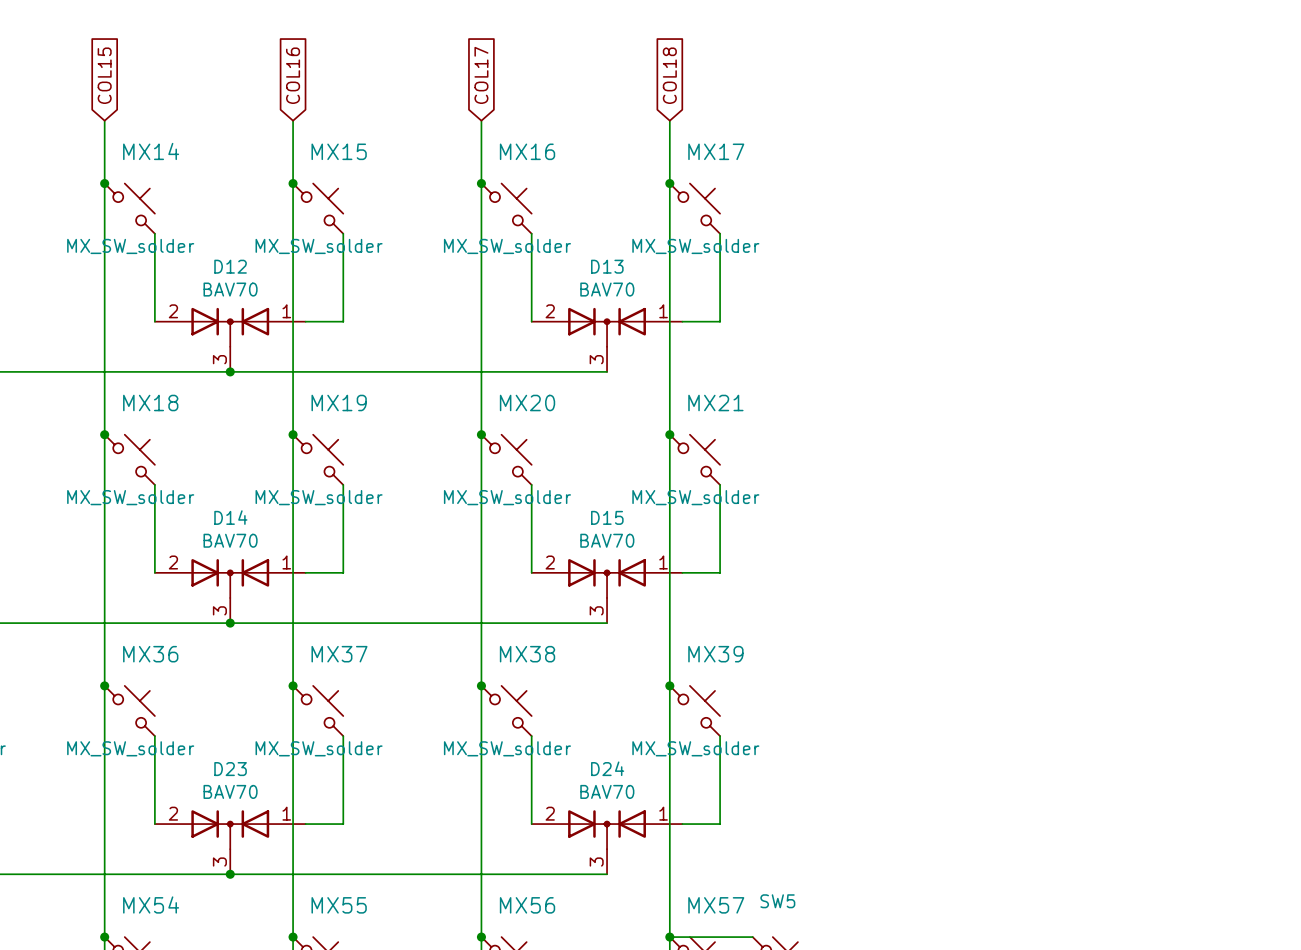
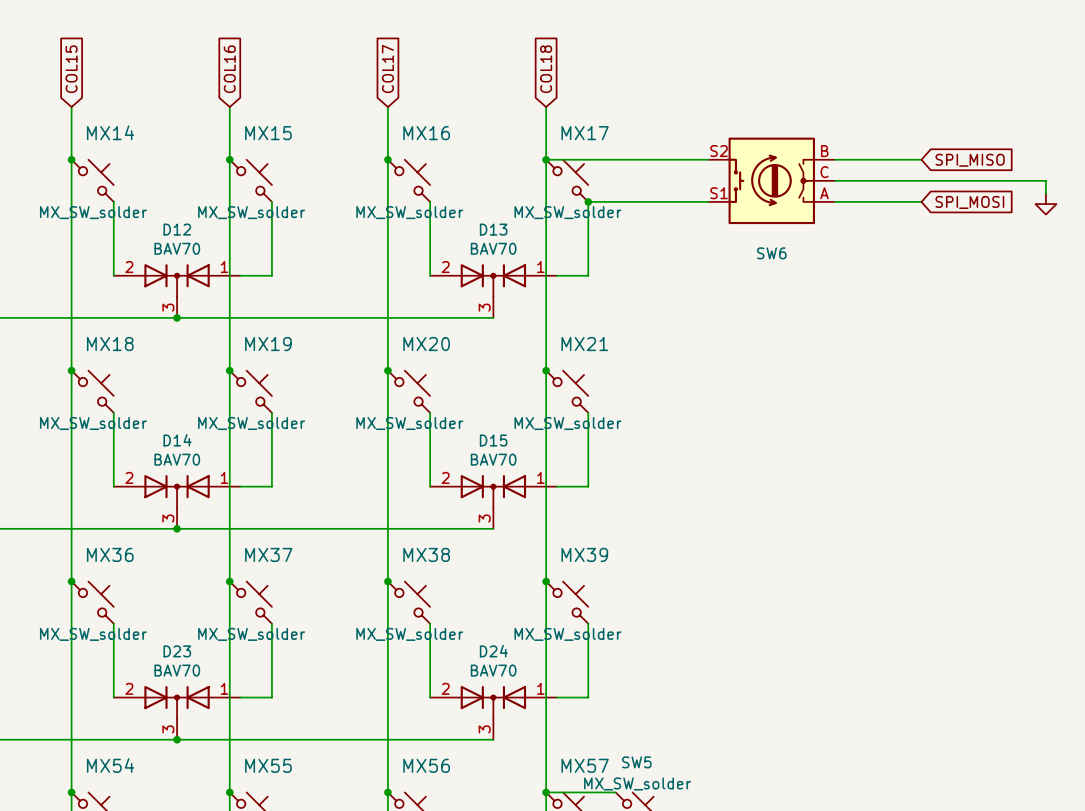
wire: none -> (546, 159) (708, 159)
wire: none -> (835, 159) (921, 159)
global label: none -> SPI_MISO (970, 160)
SW6: none -> (771, 180)
wire: none -> (835, 180) (1045, 180) (1045, 193)
wire: none -> (588, 201) (708, 201)
junction: none -> (588, 201)
wire: none -> (835, 201) (921, 201)
global label: none -> SPI_MOSI (969, 202)
power symbol: none -> (1045, 204)
SW5 value: none -> MX_SW_solder (637, 783)

